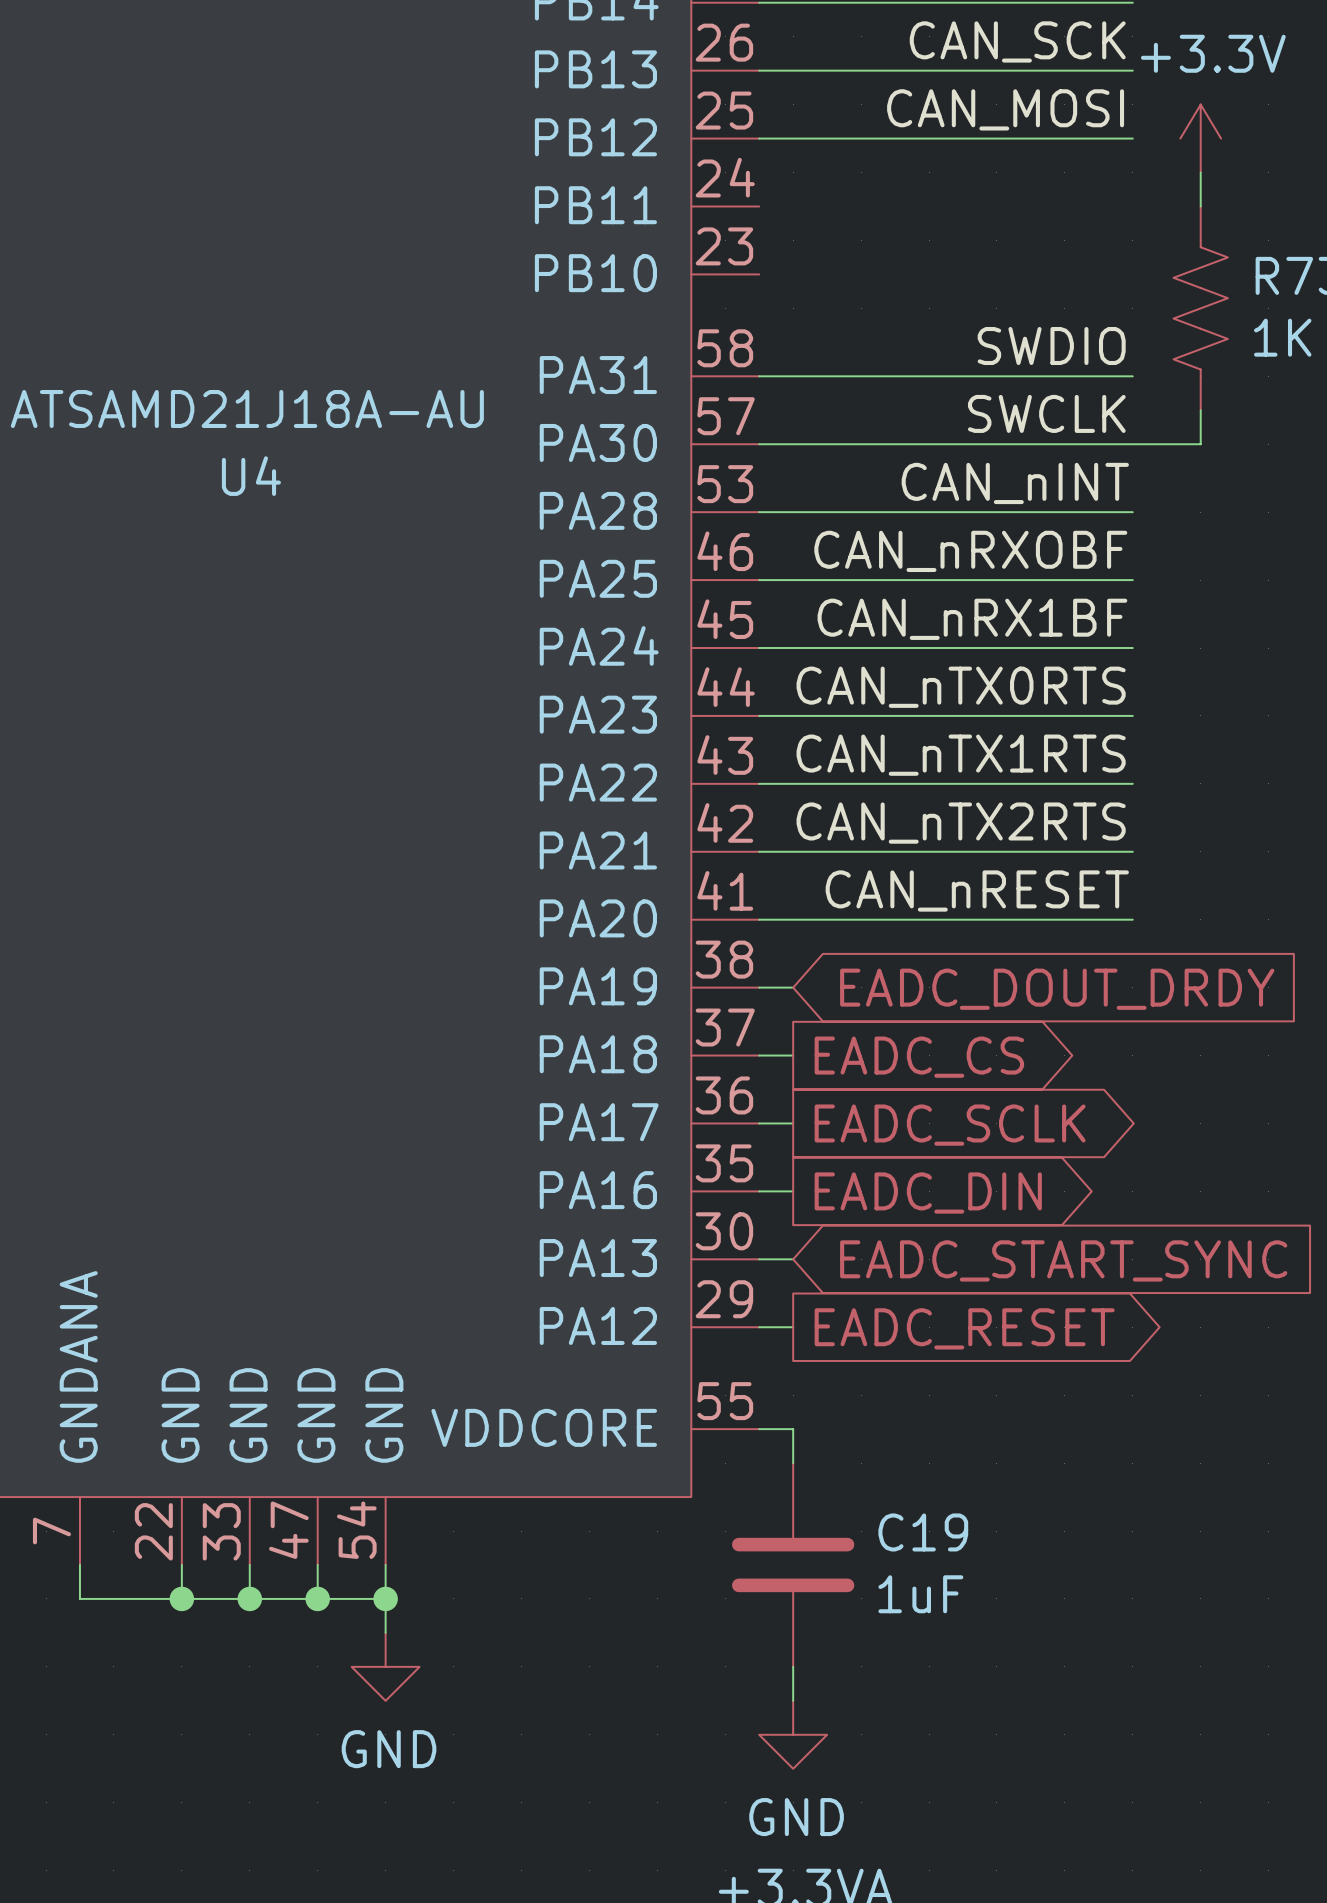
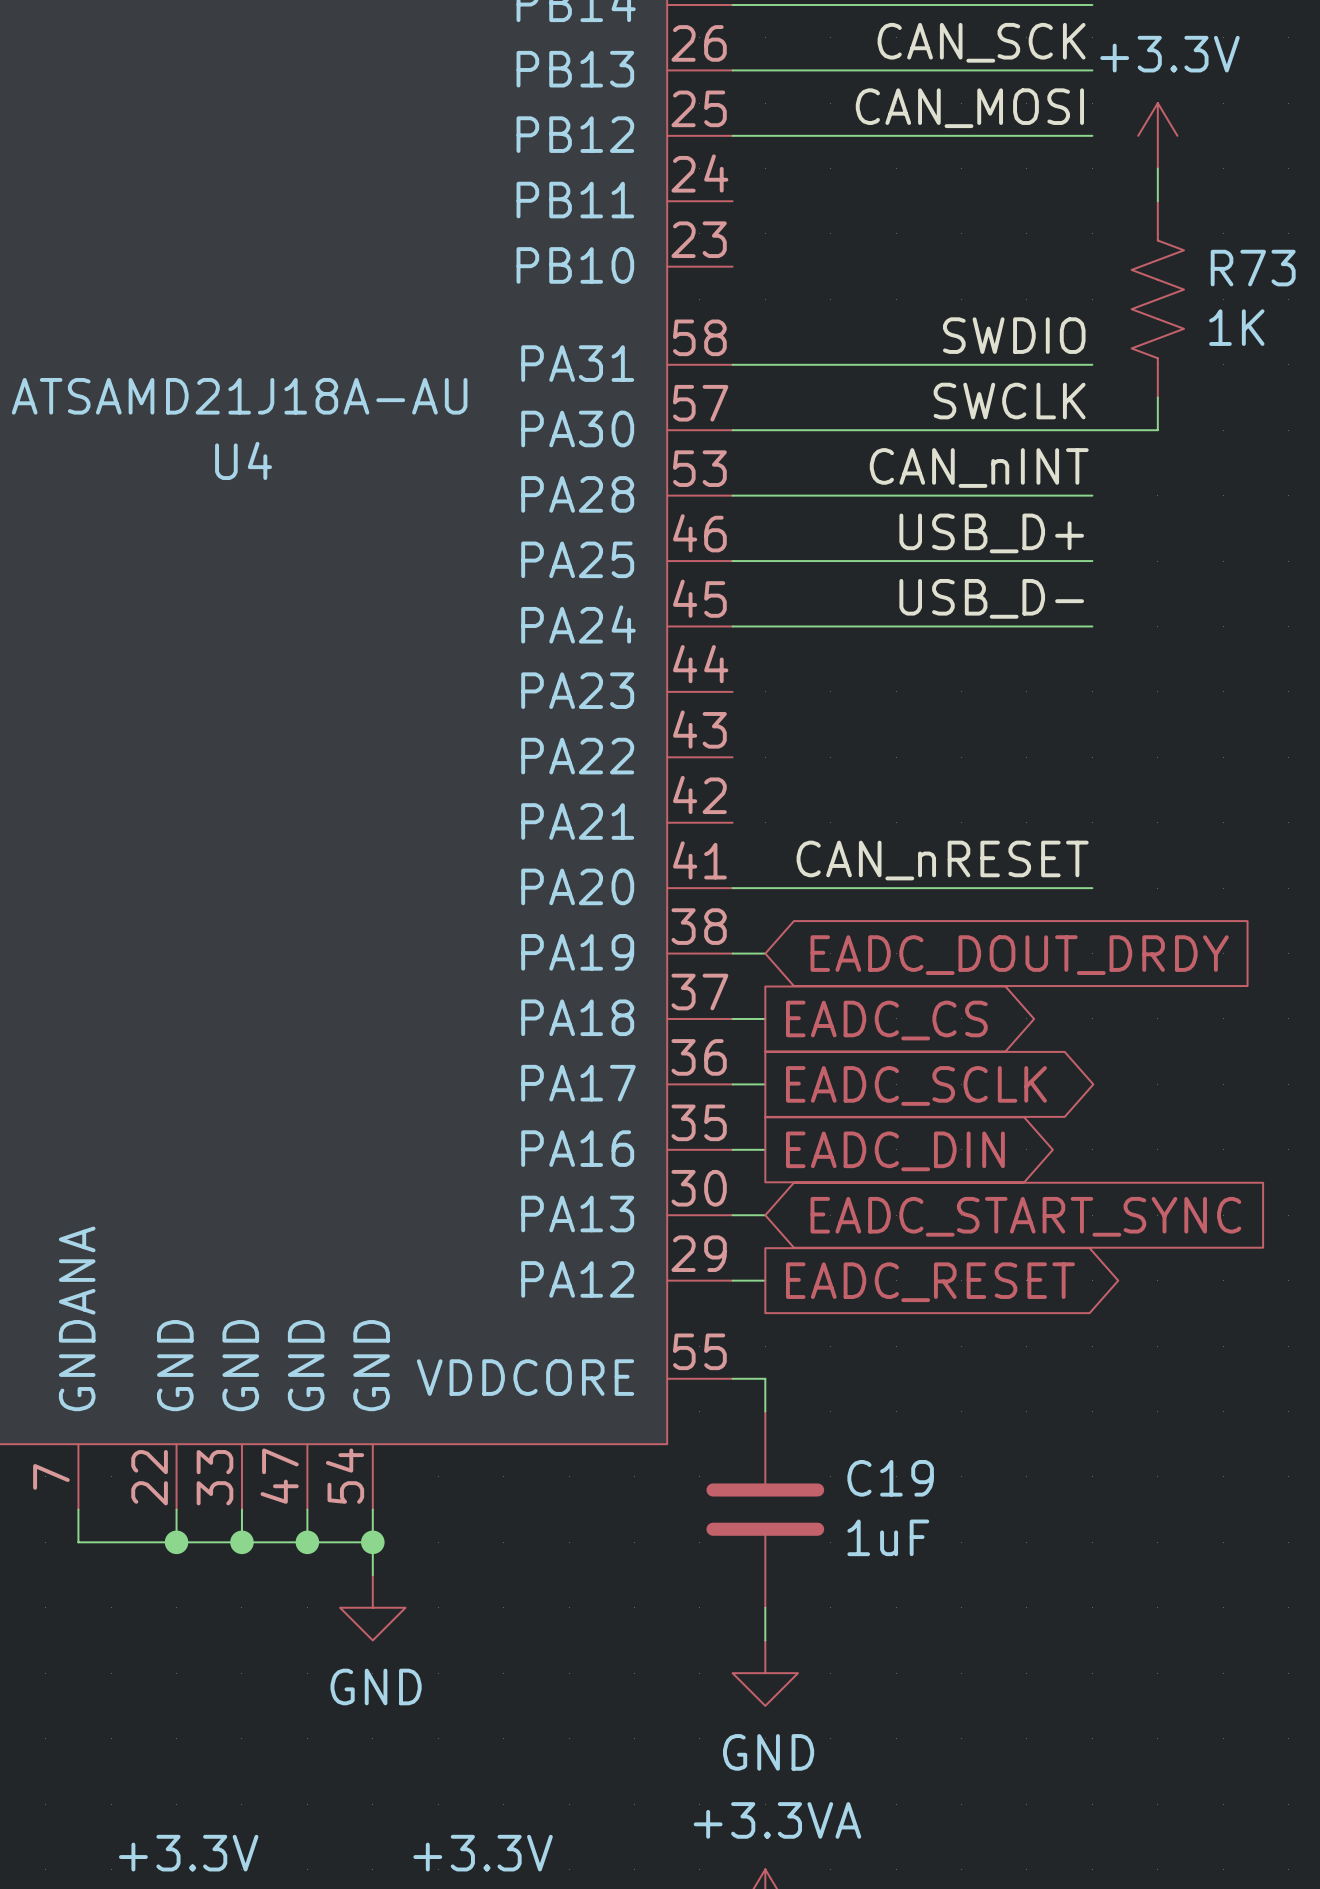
label: CAN_nRXOBF (970, 551) -> USB_D+ (991, 533)
label: CAN_nRX1BF (972, 619) -> USB_D- (991, 598)
label: CAN_nTX0RTS (961, 687) -> none
wire: (759, 715) (1132, 715) -> none
label: CAN_nTX1RTS (961, 755) -> none
wire: (759, 783) (1132, 783) -> none
label: CAN_nTX2RTS (961, 823) -> none
wire: (759, 851) (1132, 851) -> none

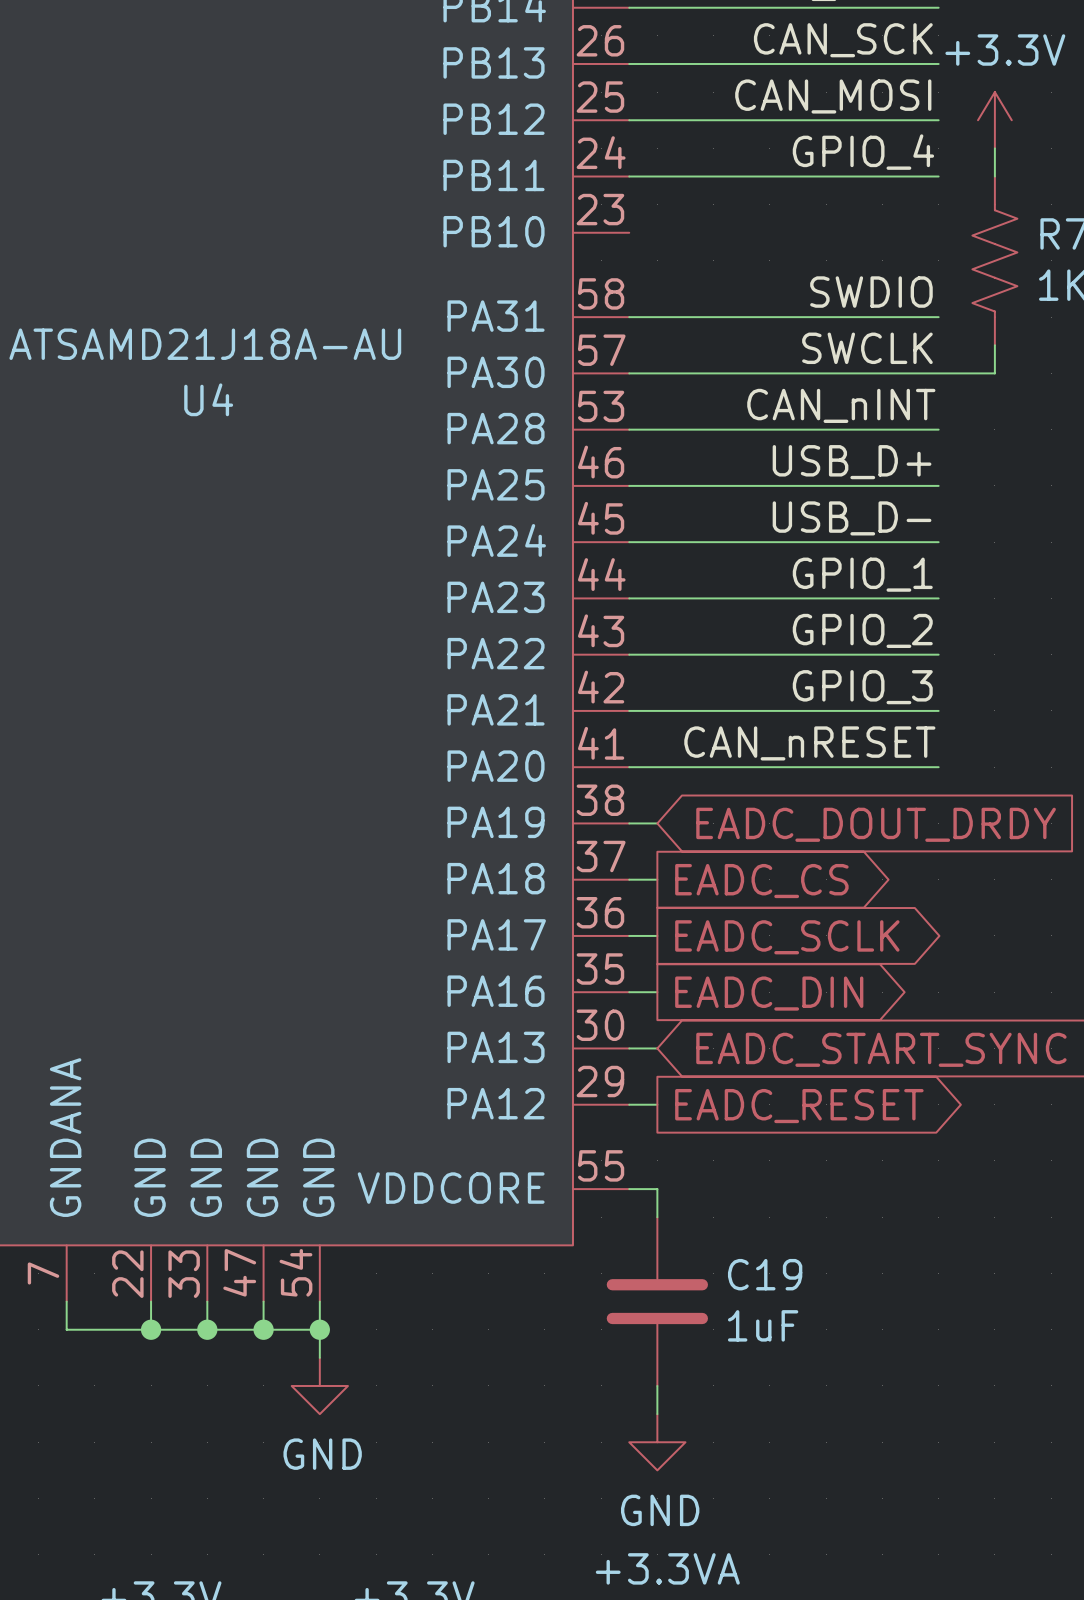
label: none -> GPIO_4 (863, 152)
wire: none -> (629, 176) (938, 176)
label: none -> GPIO_1 (862, 574)
wire: none -> (629, 598) (938, 598)
label: none -> GPIO_2 (862, 630)
wire: none -> (629, 654) (938, 654)
label: none -> GPIO_3 (862, 687)
wire: none -> (629, 710) (938, 710)

